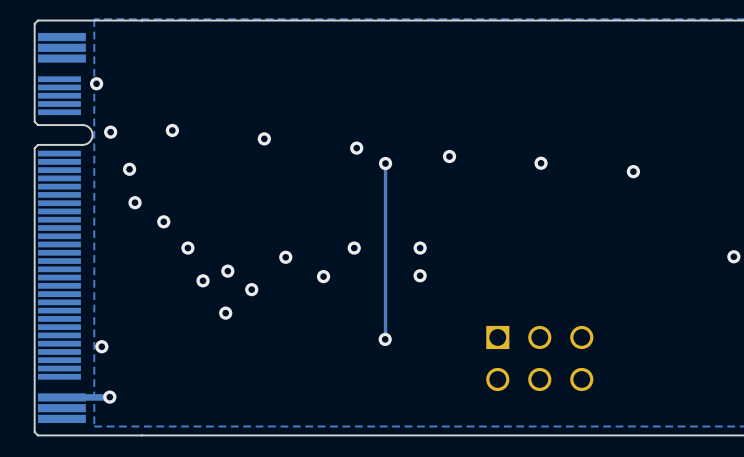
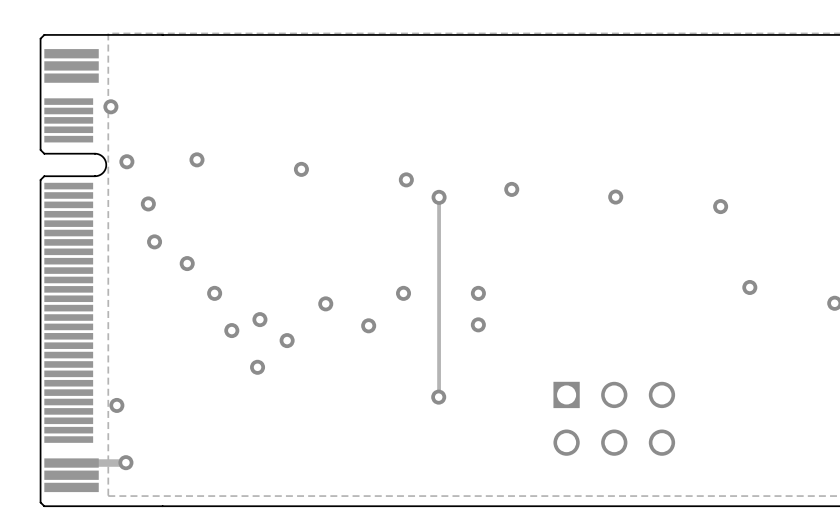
via: none -> (749, 287)

